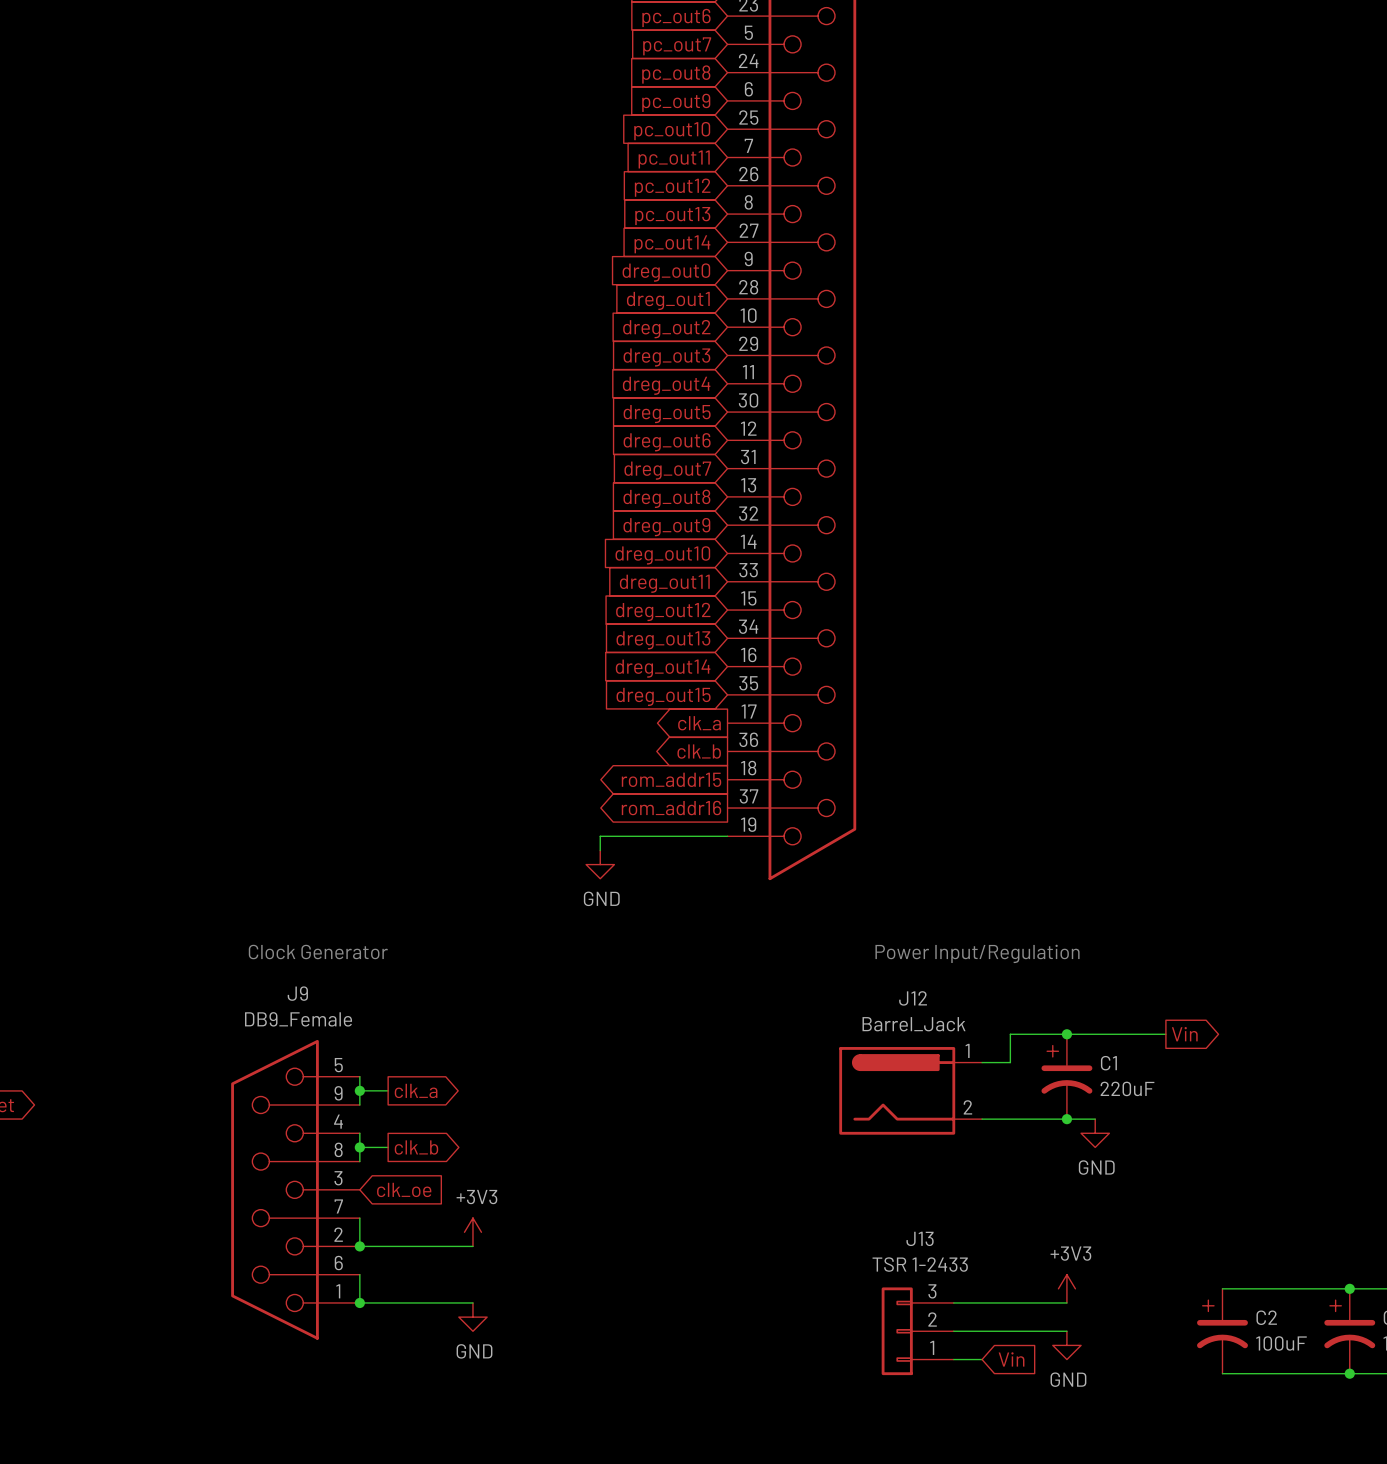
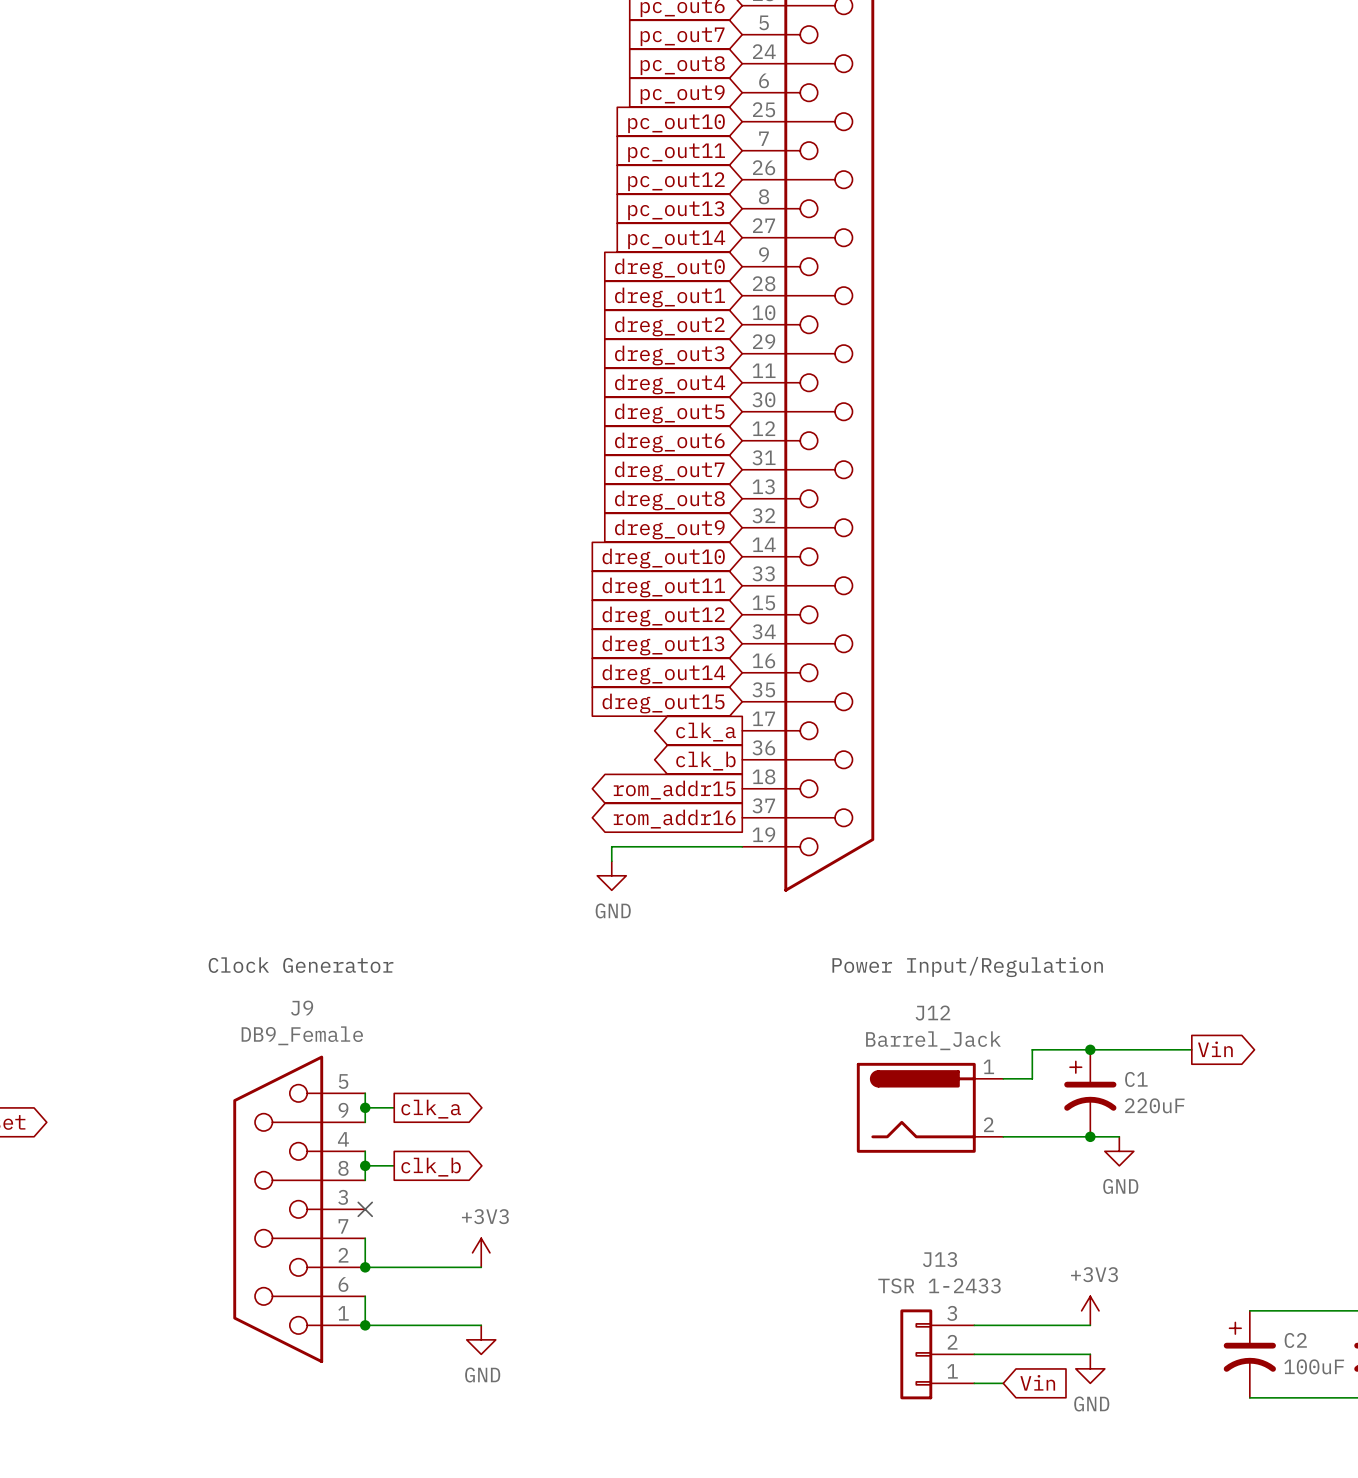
no-connect mark: none -> (365, 1209)
global label: clk_oe (404, 1189) -> none

